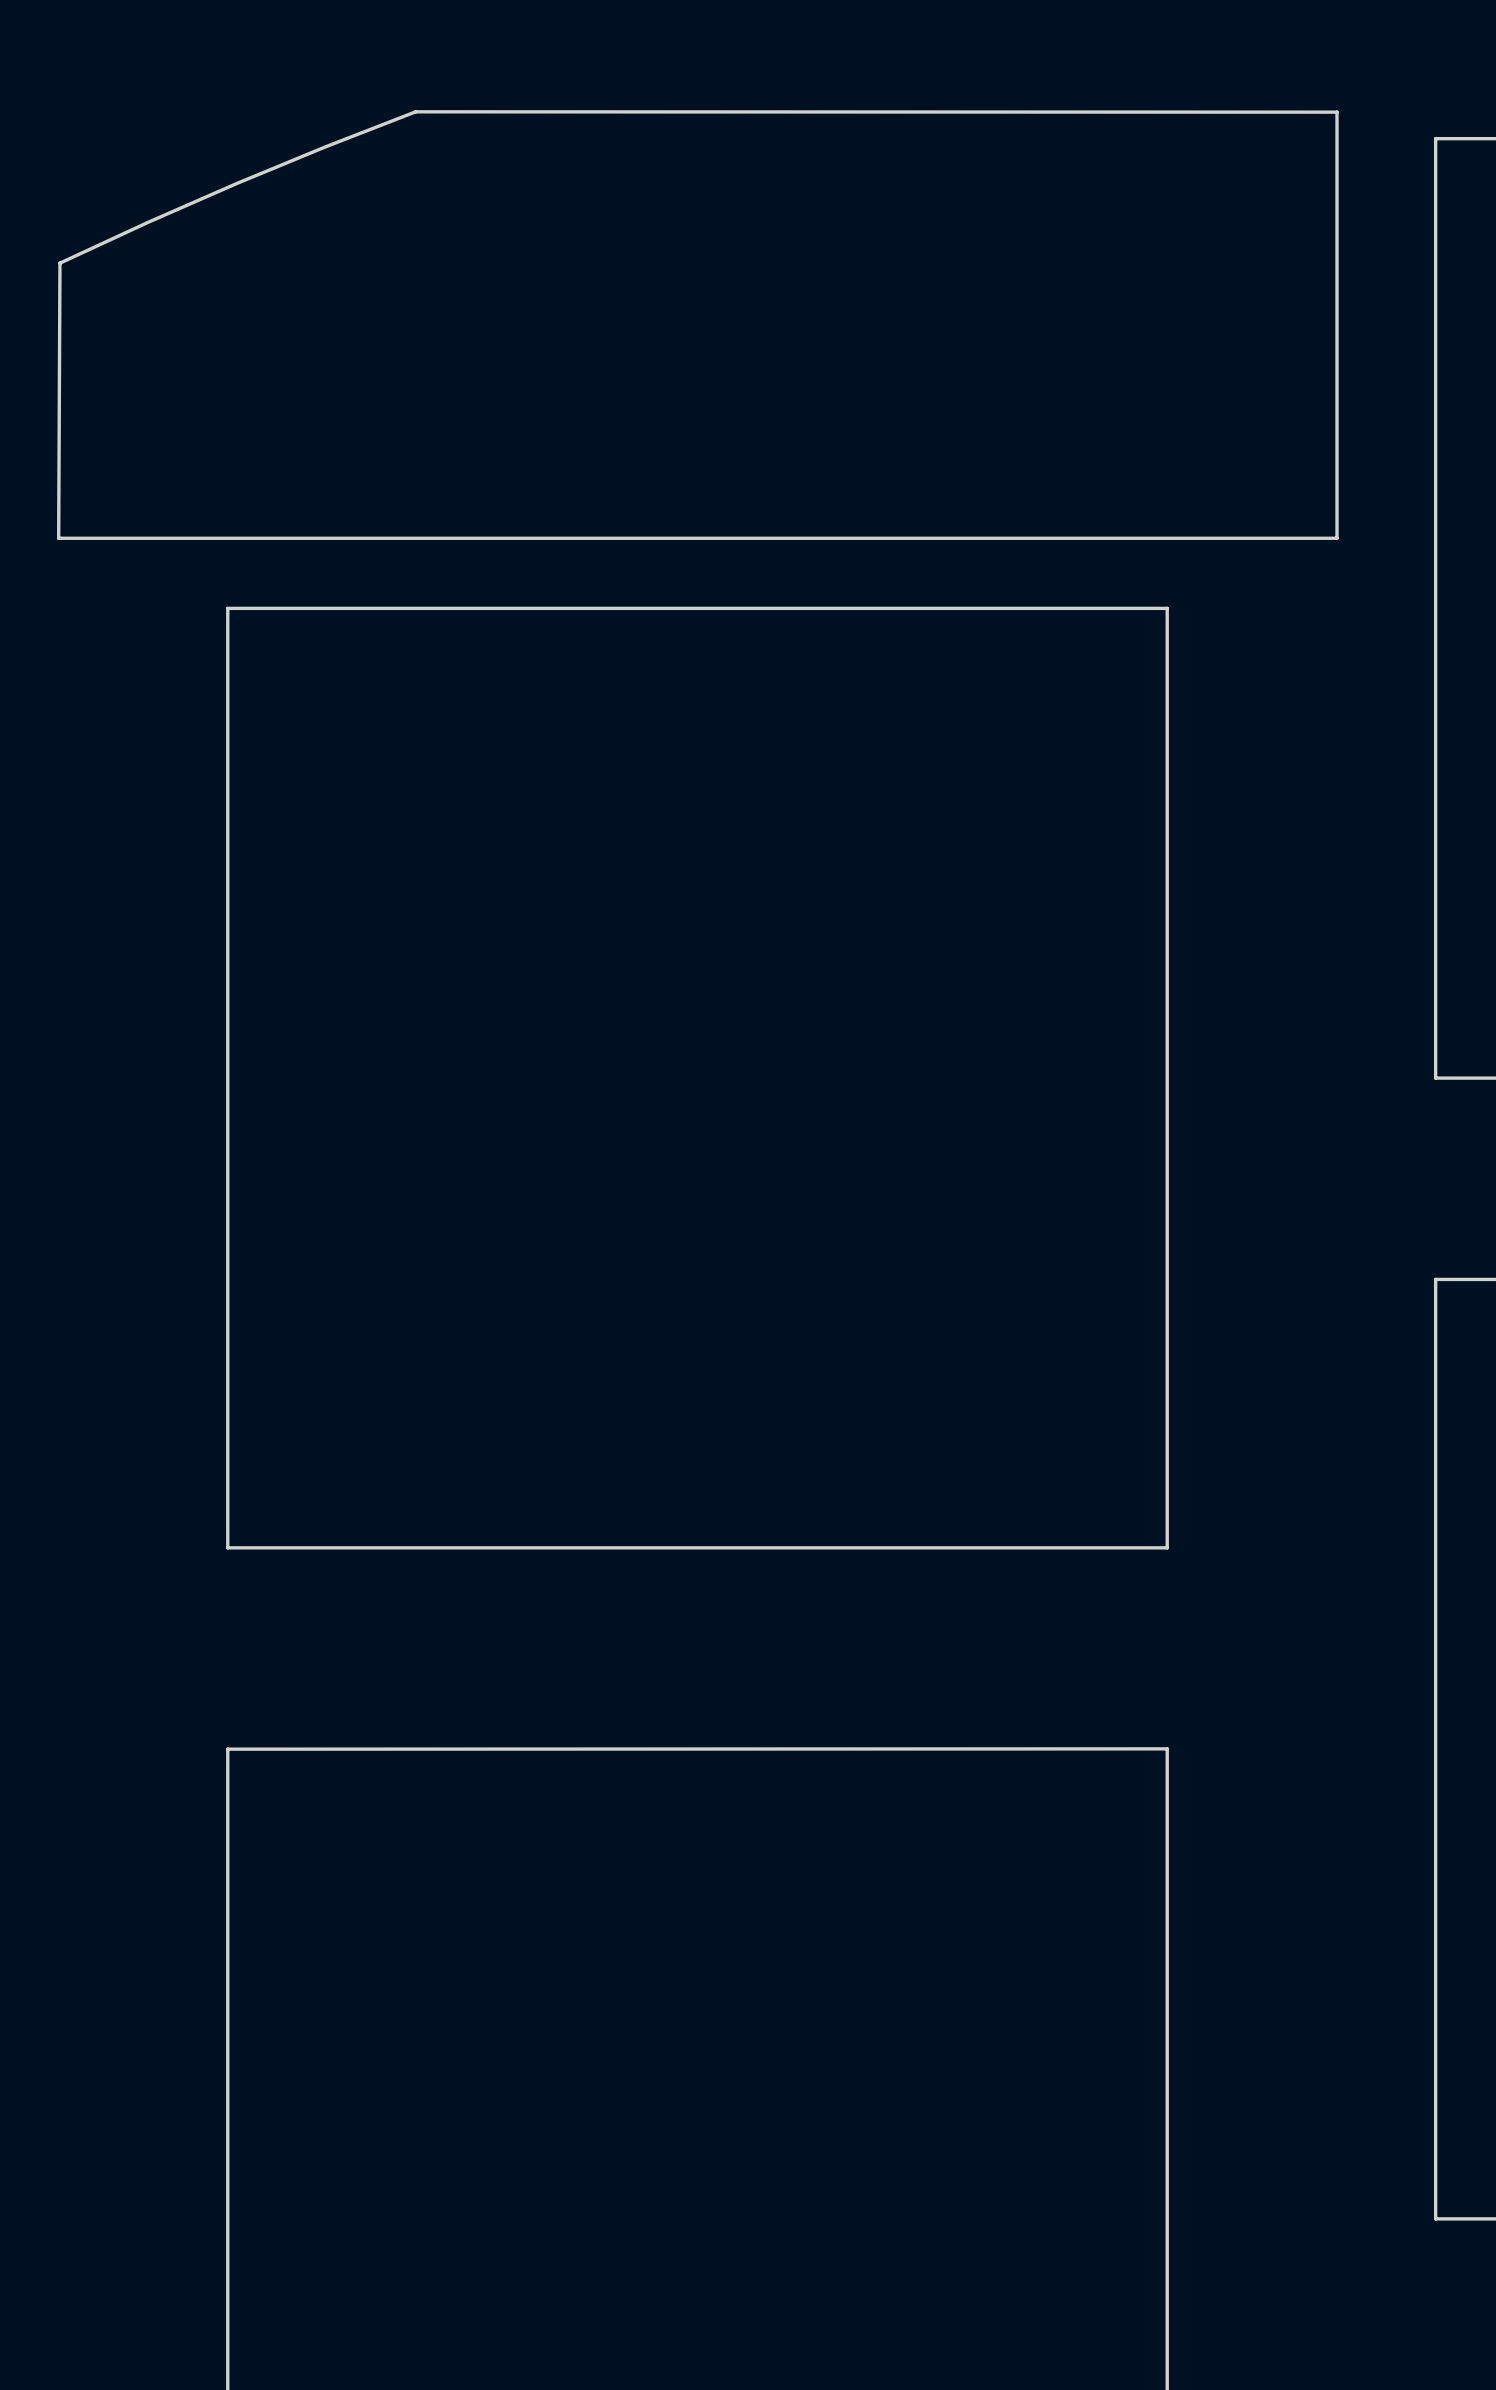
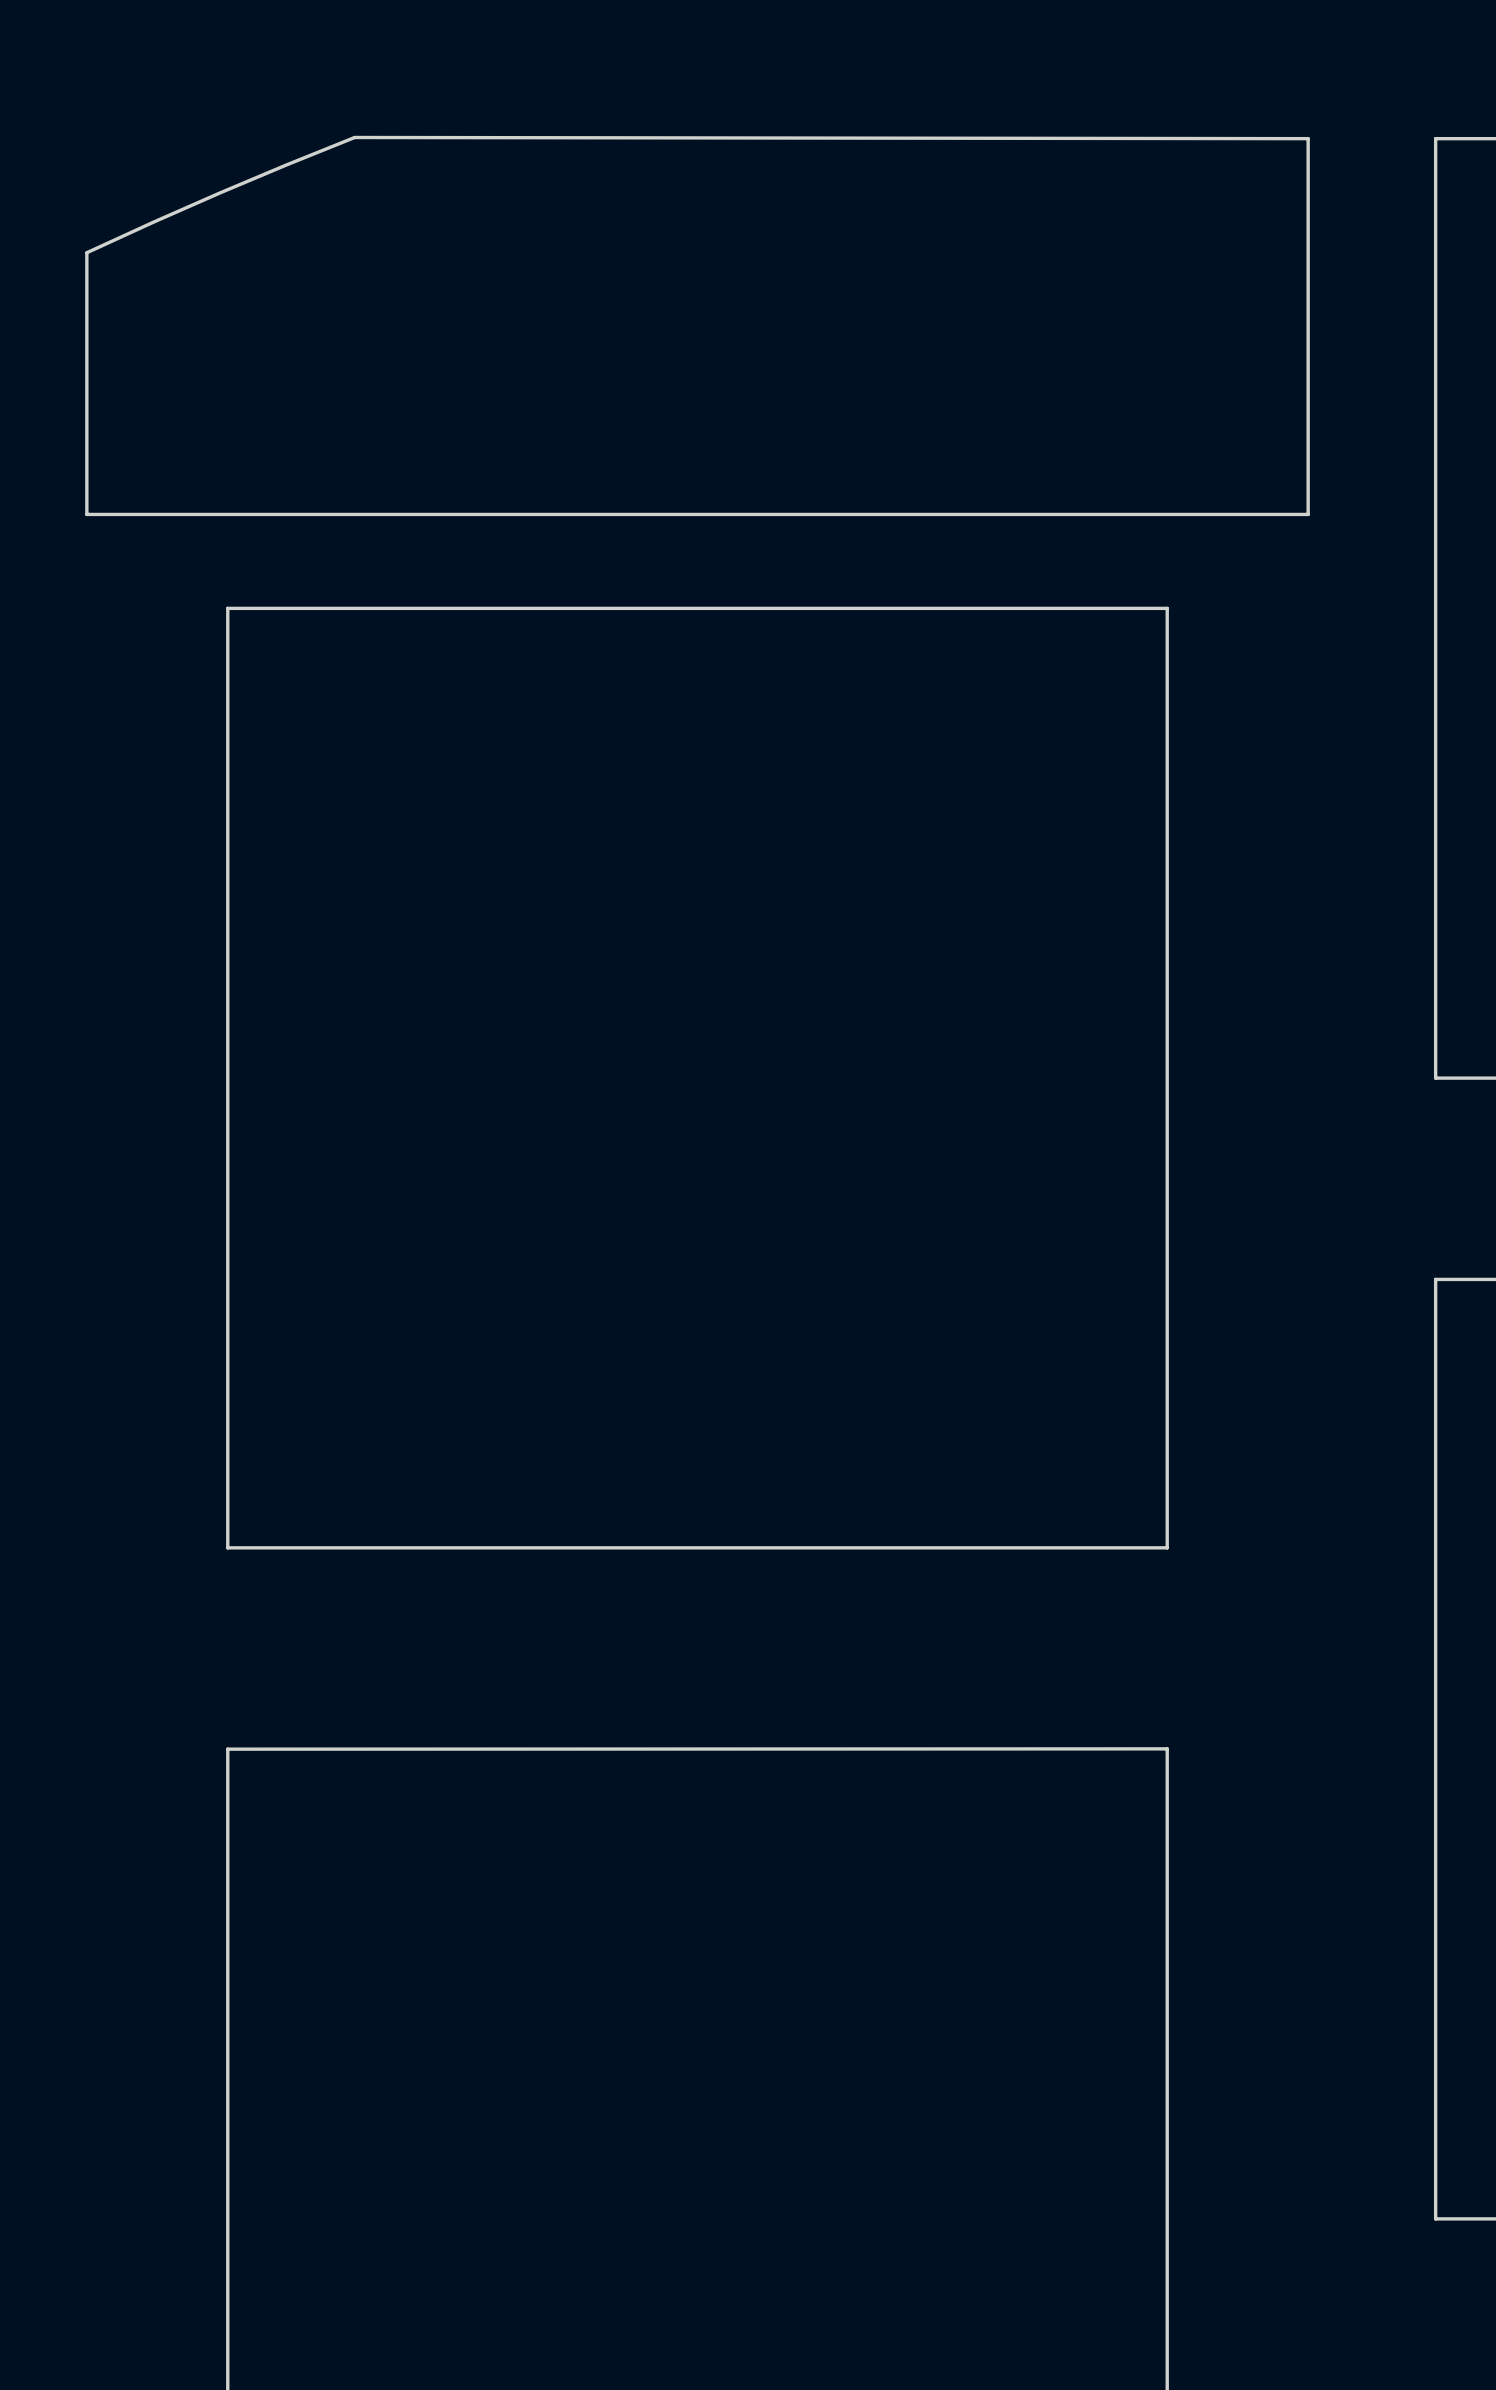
board edge: (415, 111) (1337, 112) (1337, 538) (58, 538) (59, 263) (236, 183) (415, 111) -> (354, 137) (1308, 138) (1308, 514) (86, 514) (86, 252) (219, 192) (354, 137)

